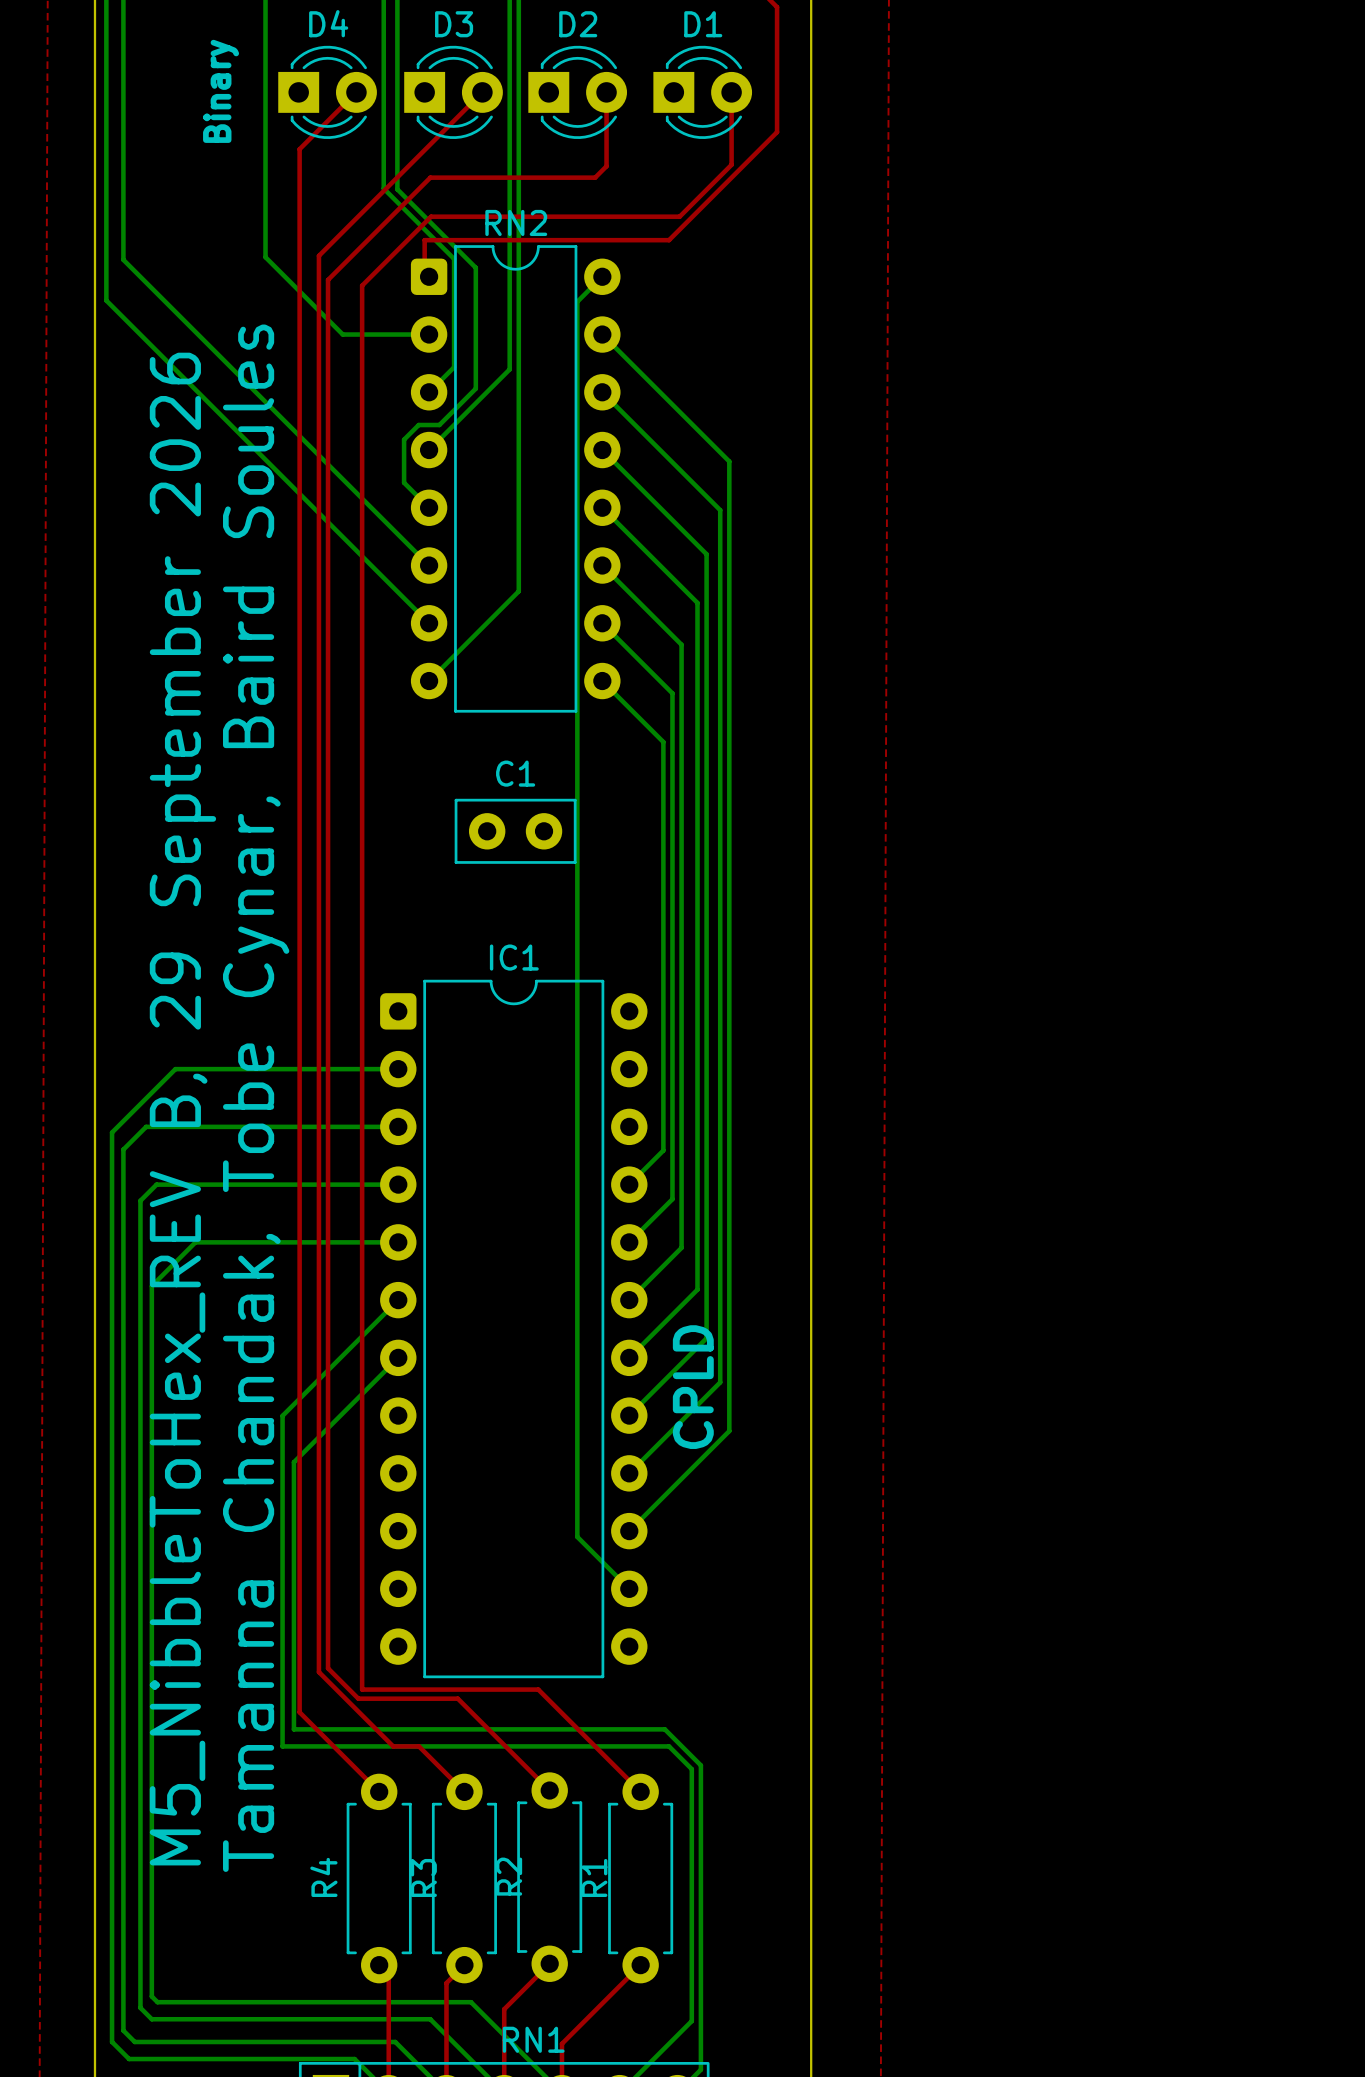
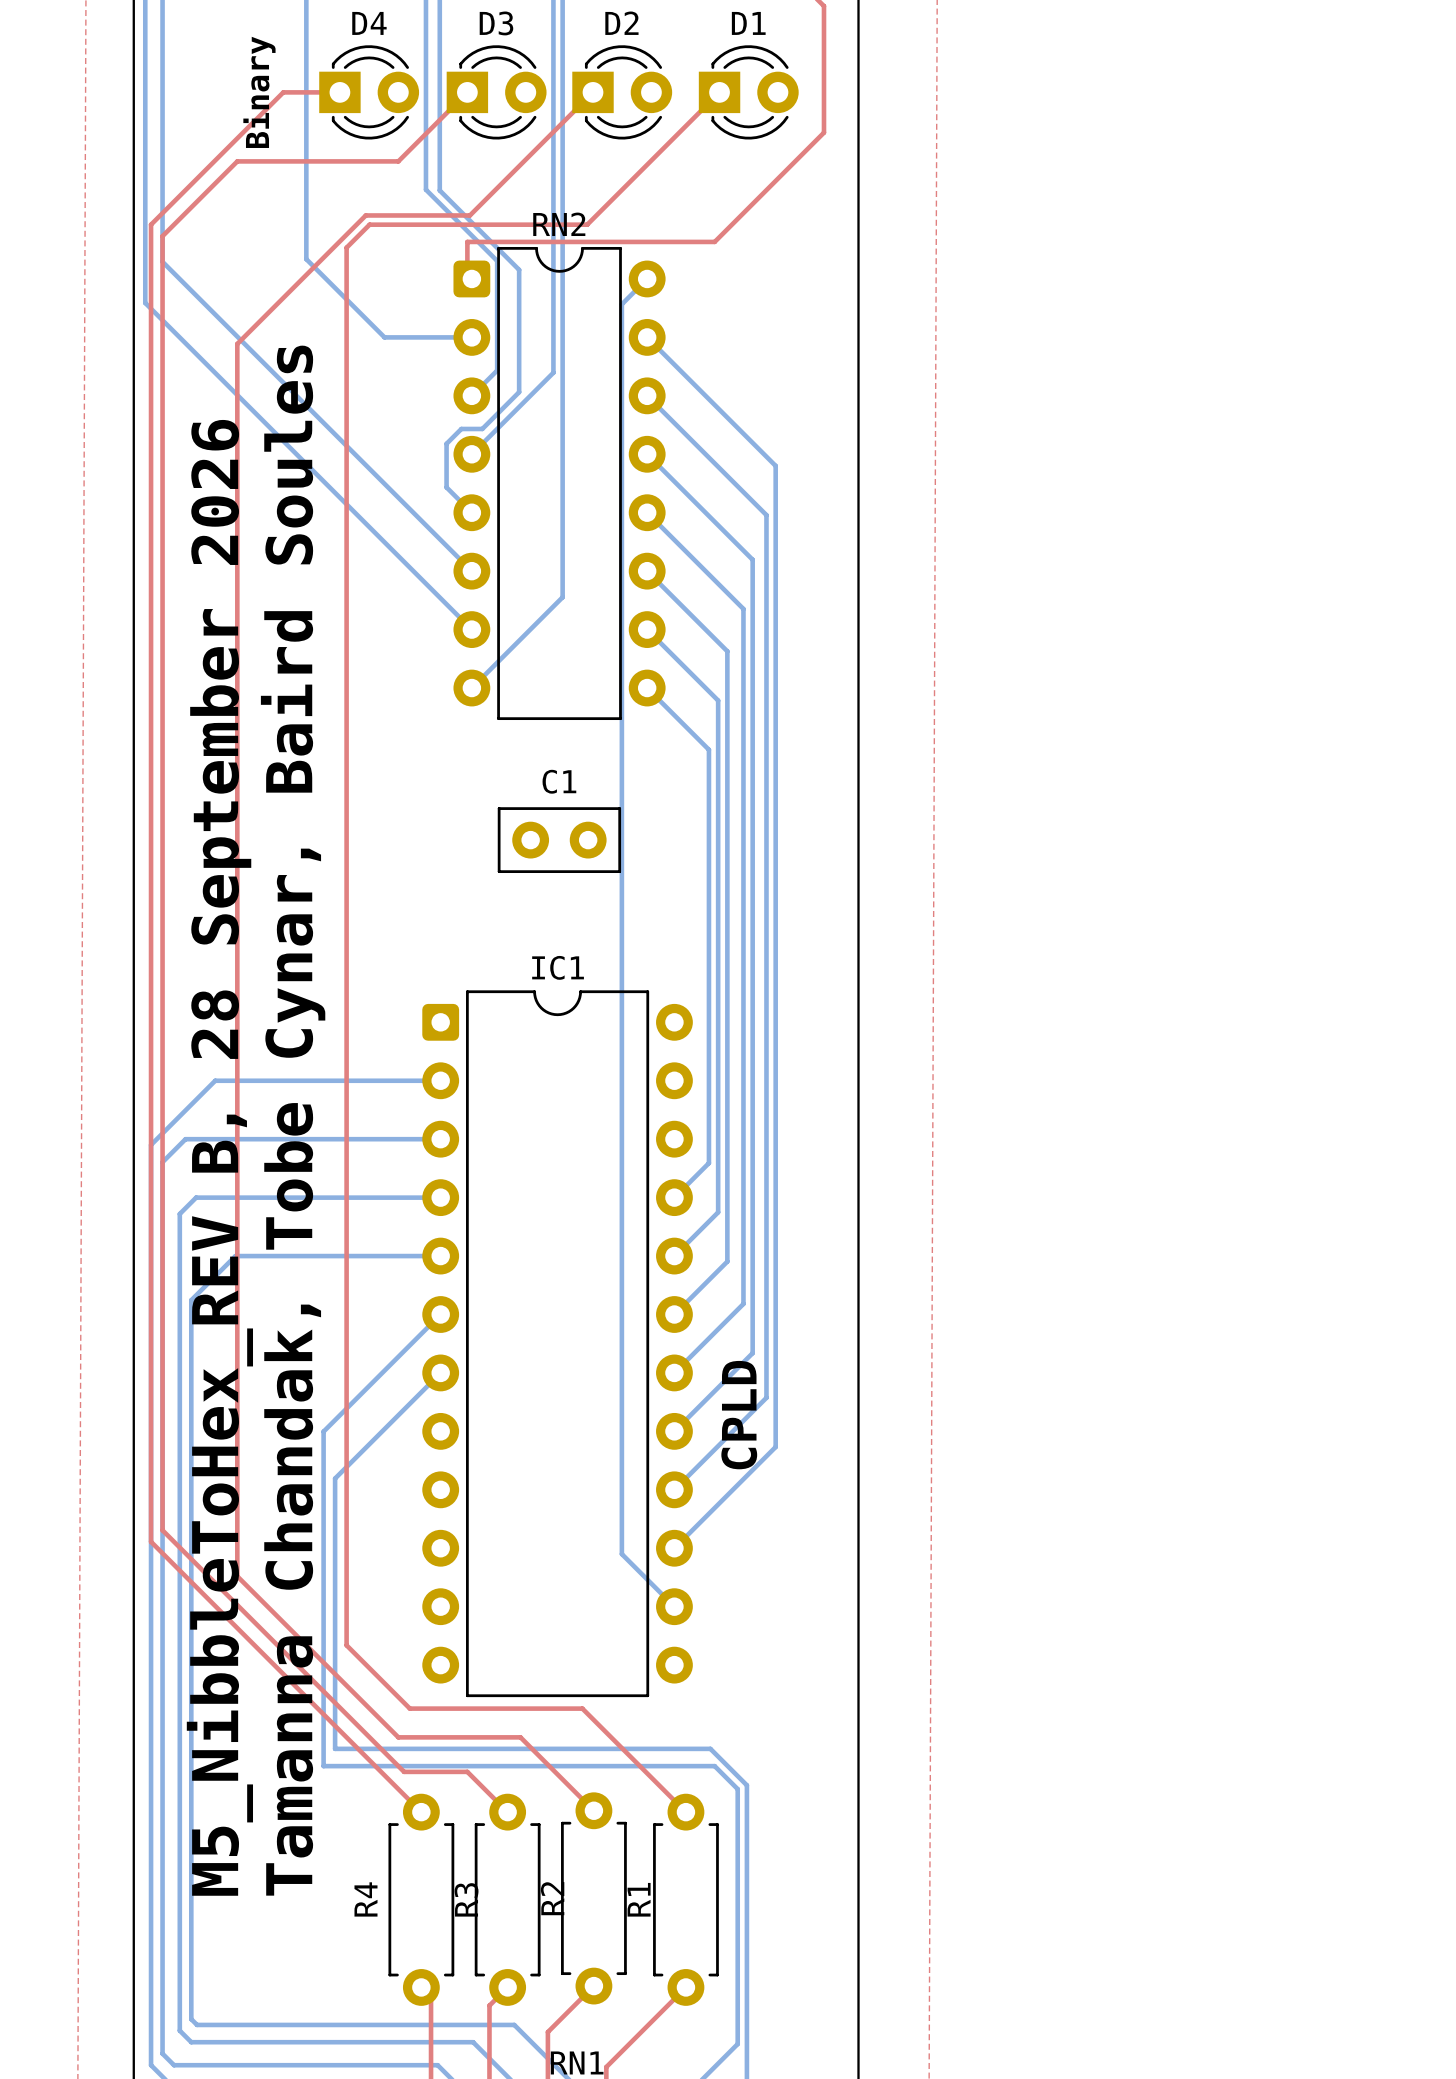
top track: (356, 92) (299, 149) (299, 1712) -> (339, 92) (283, 92) (151, 224) (151, 1541) (340, 1731)
top track: (482, 92) (318, 255) (318, 1672) (393, 1746) (418, 1746) (424, 1752) -> (467, 92) (398, 161) (237, 161) (162, 236) (162, 1530) (404, 1771) (467, 1771)
top track: (606, 92) (606, 166) (595, 177) (430, 177) (328, 279) (328, 1668) (358, 1698) (457, 1698) (477, 1718) -> (593, 92) (469, 215) (365, 215) (237, 343) (237, 1576) (398, 1737) (520, 1737)
top track: (731, 92) (731, 164) (679, 216) (431, 216) (362, 285) (362, 1689) (367, 1689) -> (719, 92) (587, 224) (369, 224) (346, 247) (346, 1645) (409, 1708)
text: M5_NibbleToHex_REV B, 29 September 2026 (182, 1109) -> M5_NibbleToHex_REV B, 28 September 2026 (219, 1157)

